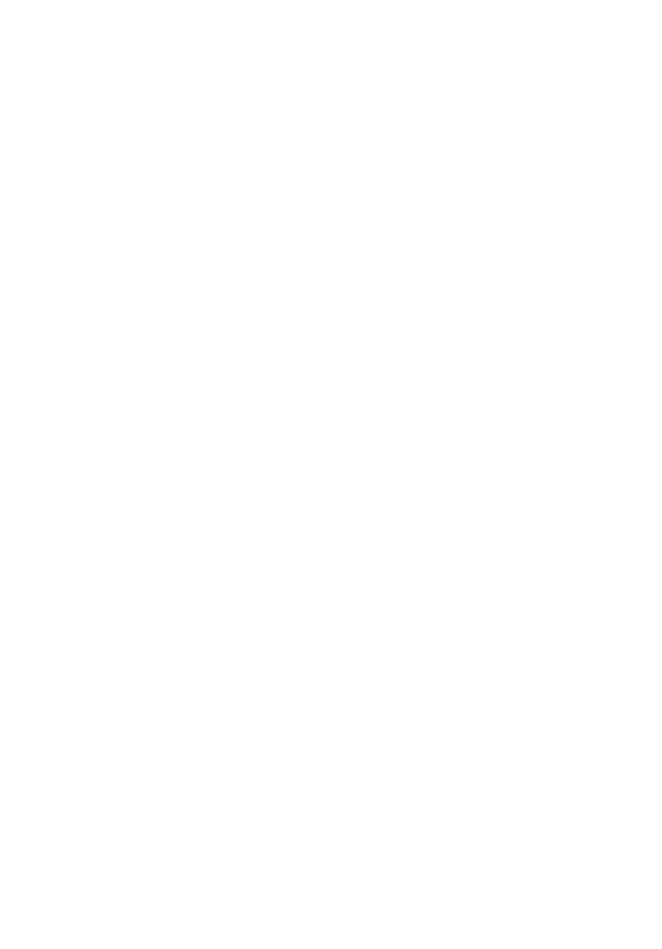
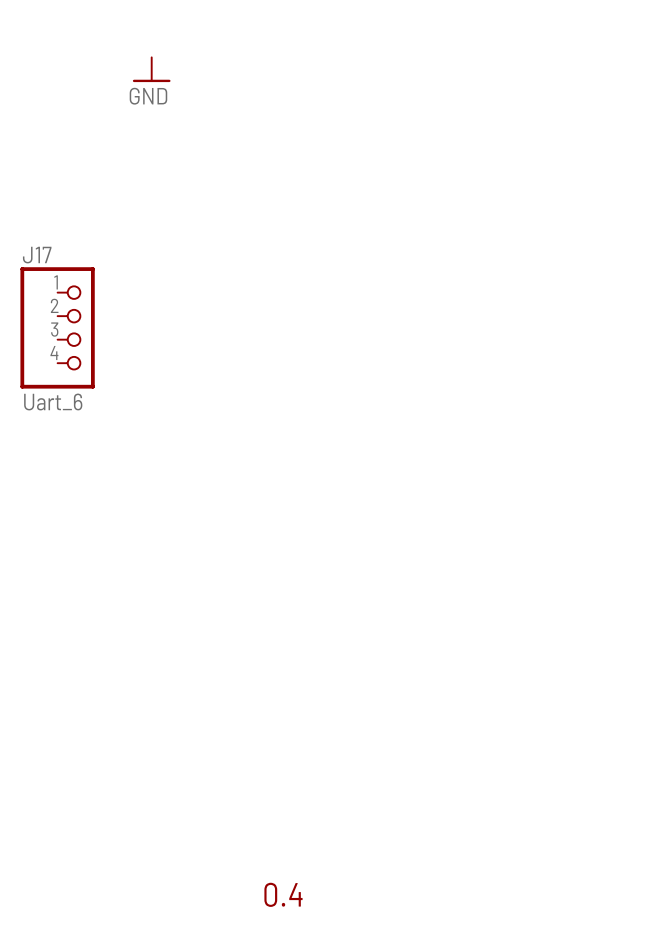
power symbol: none -> GND (151, 69)
J17: none -> Uart_6 (57, 327)
text: none -> 0.4 (283, 894)

